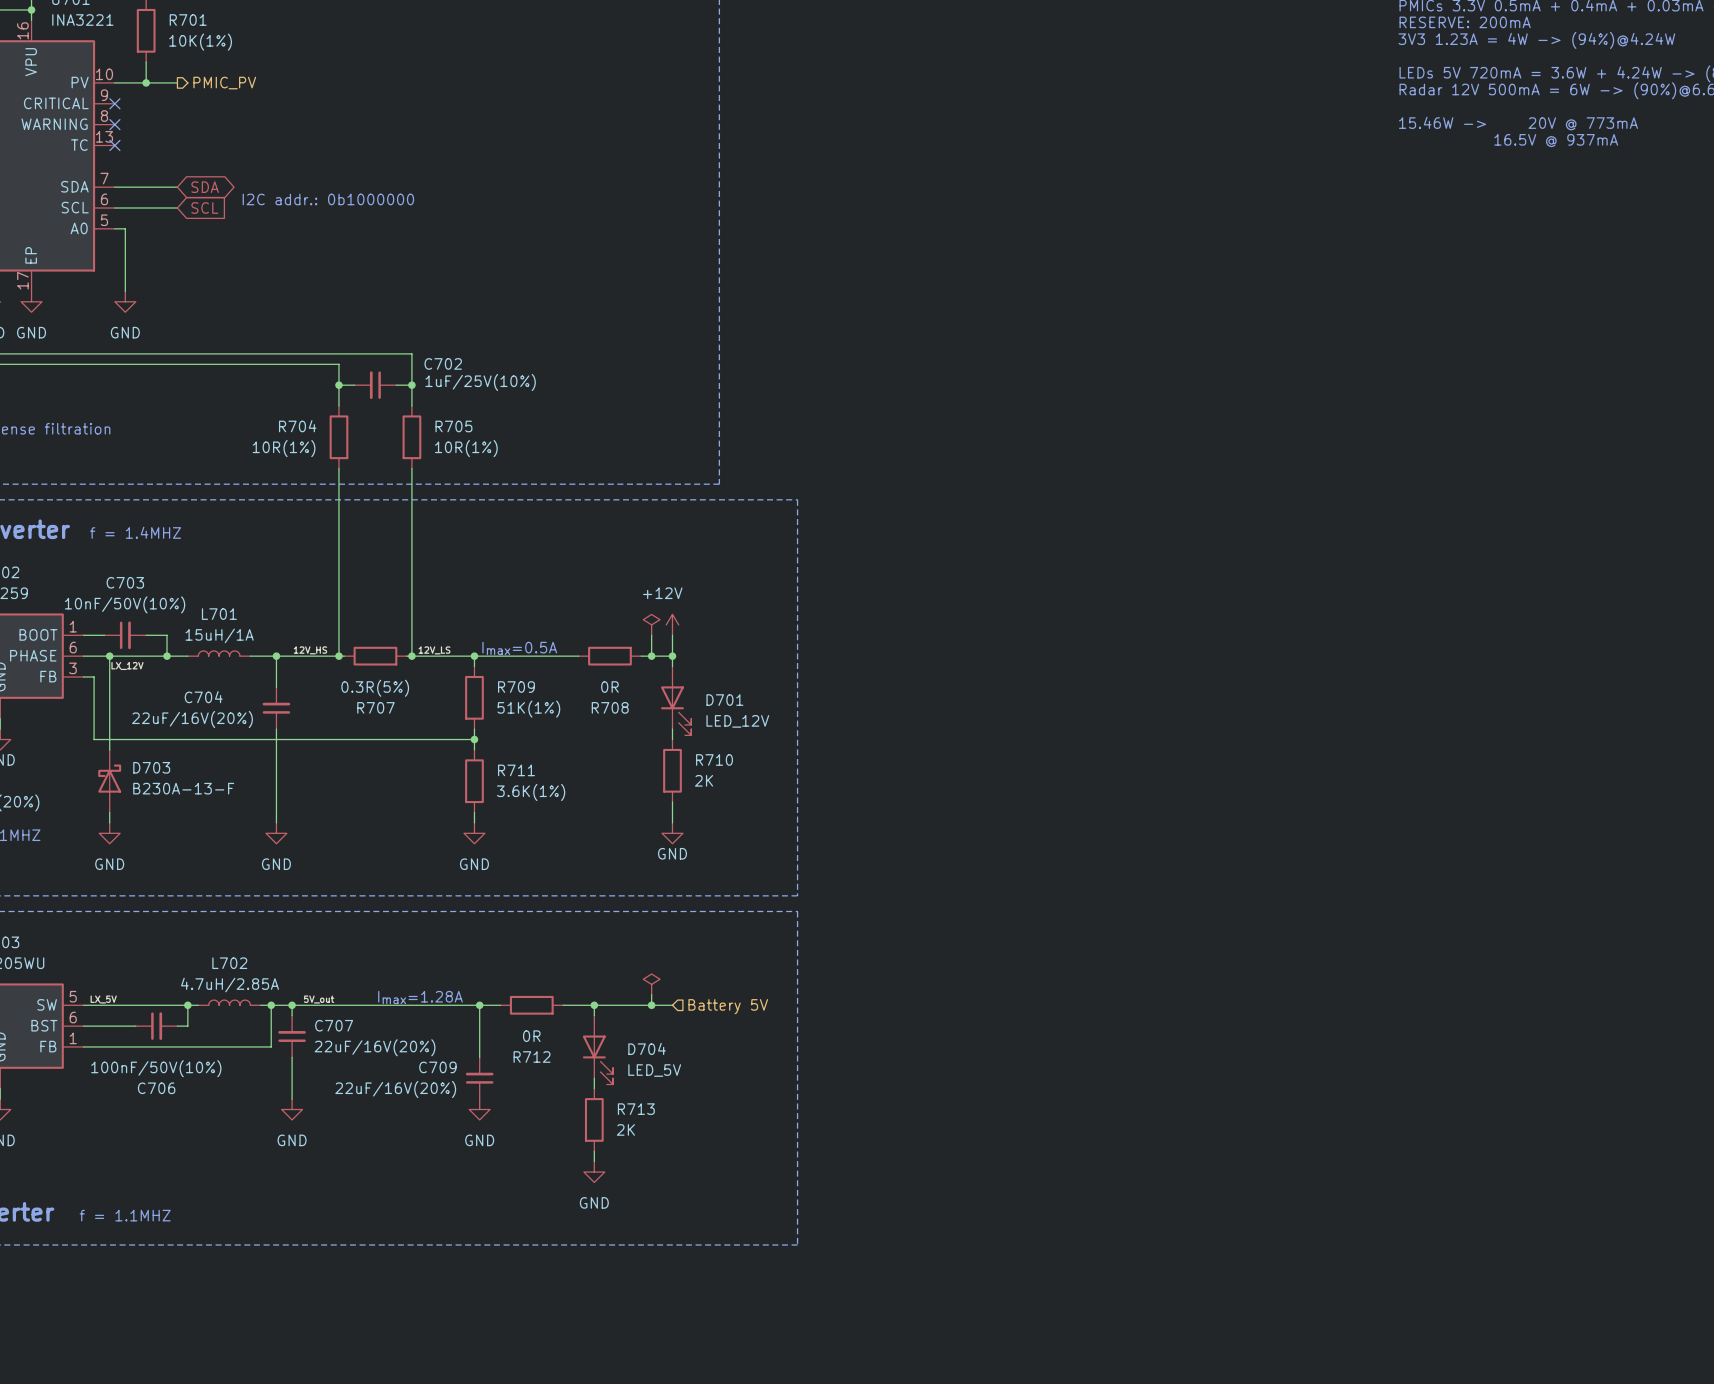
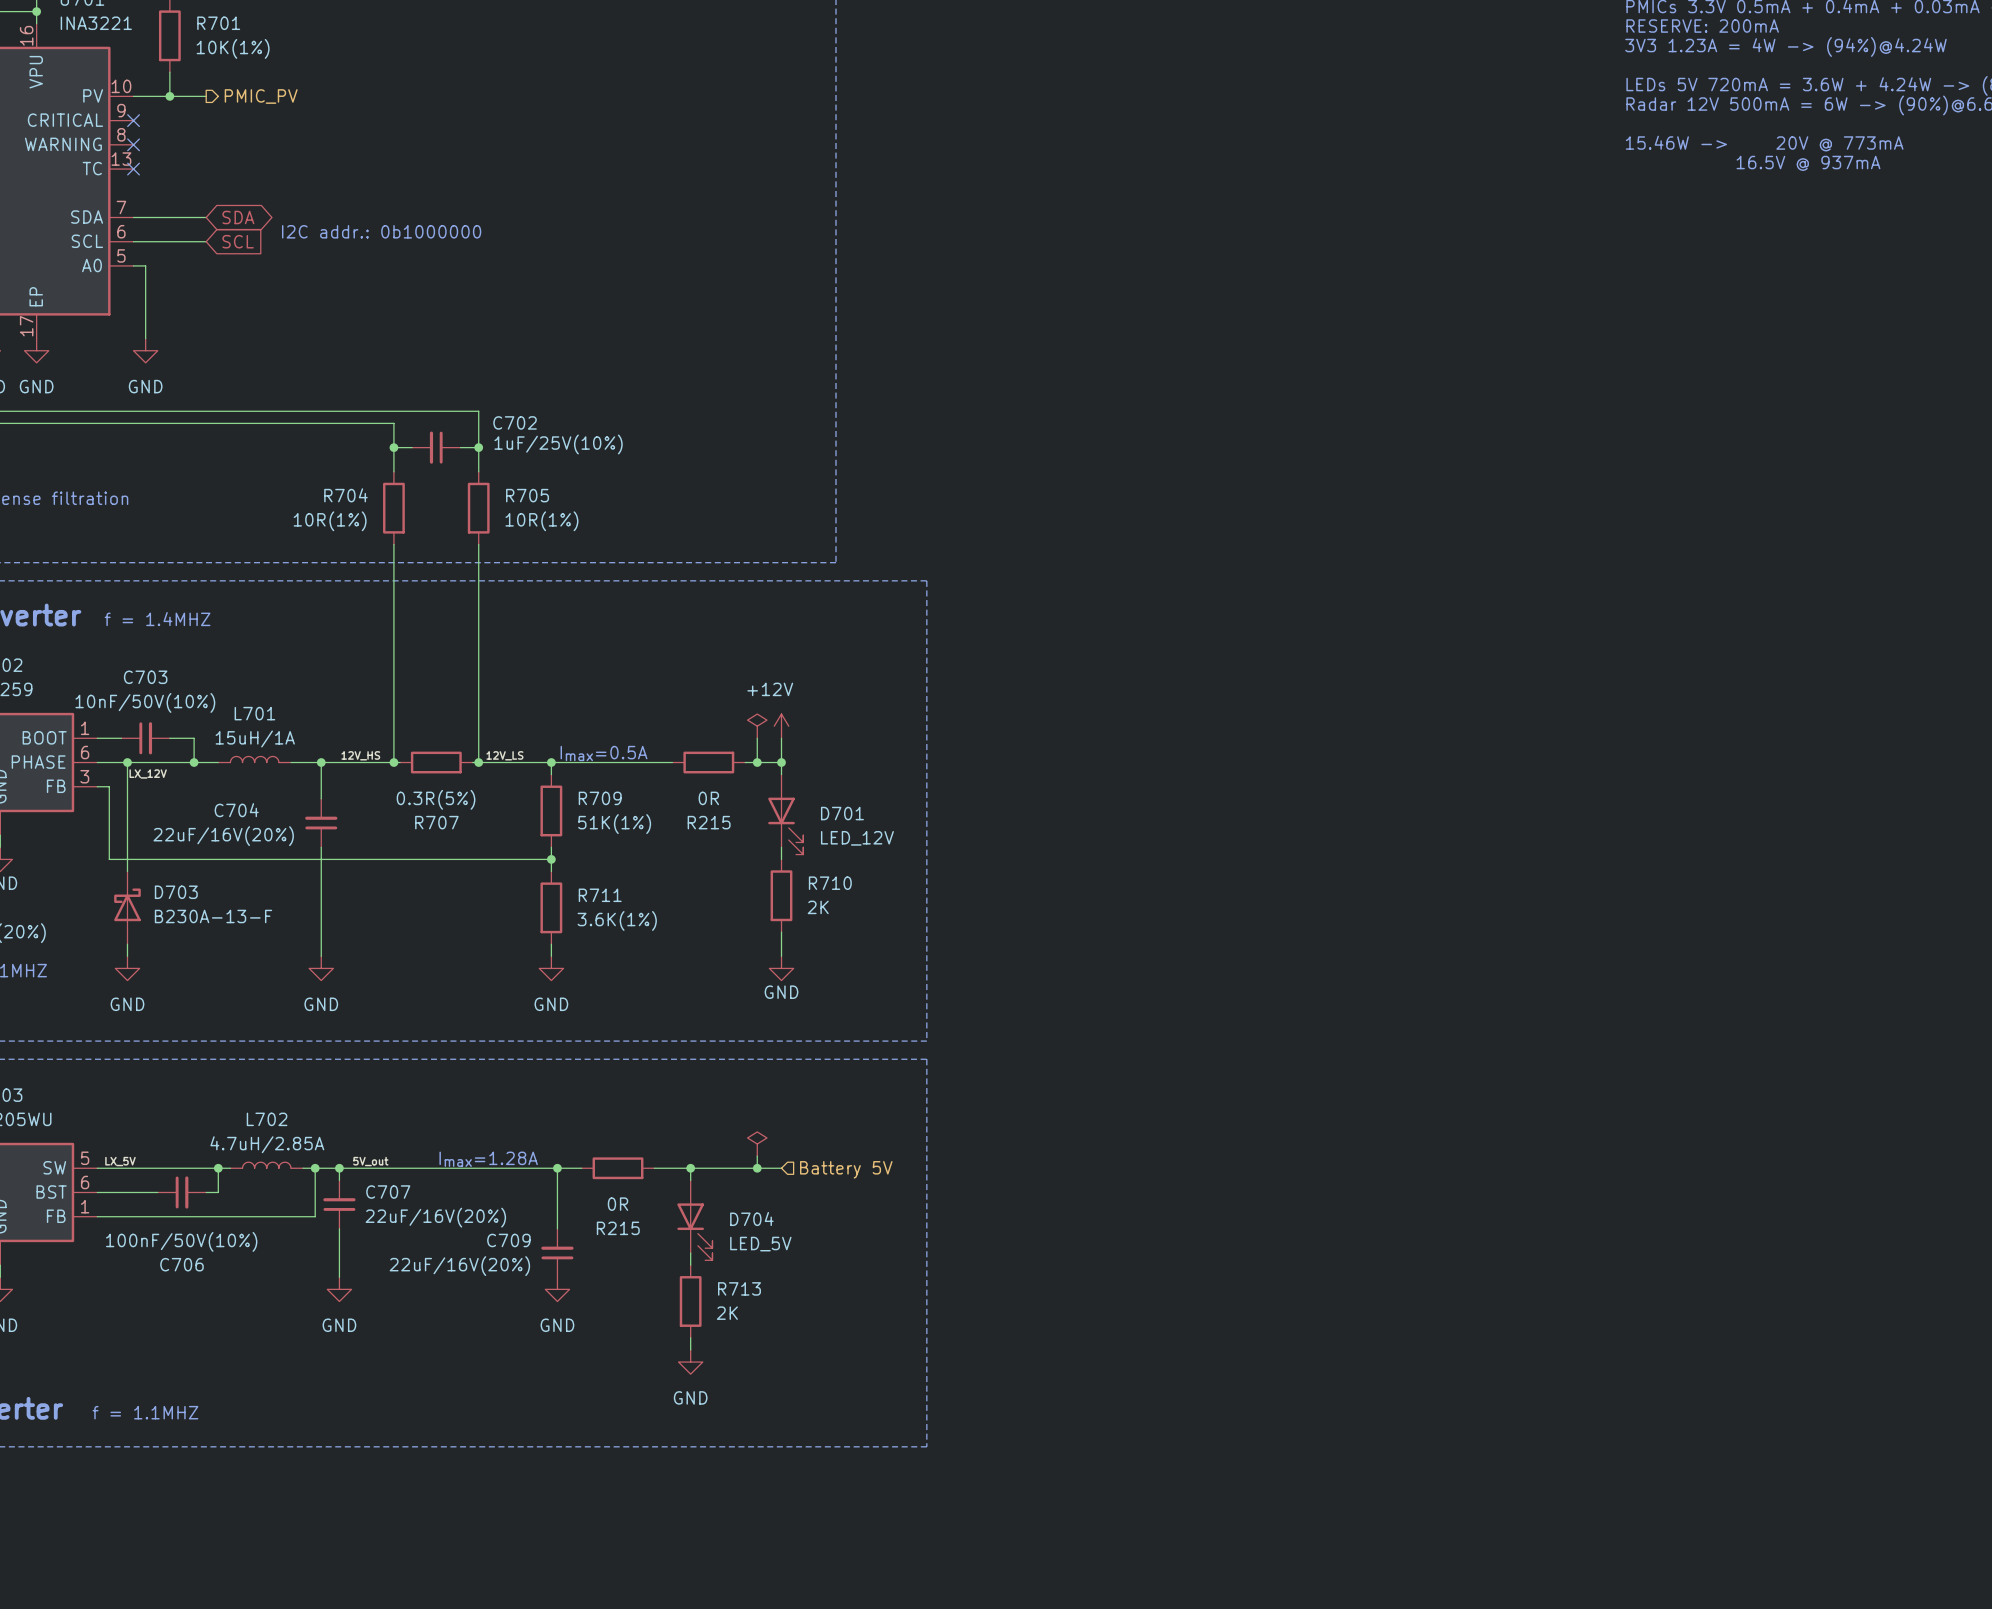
R708 name: R708 (610, 707) -> R215 (709, 822)
R712 name: R712 (532, 1057) -> R215 (618, 1228)

